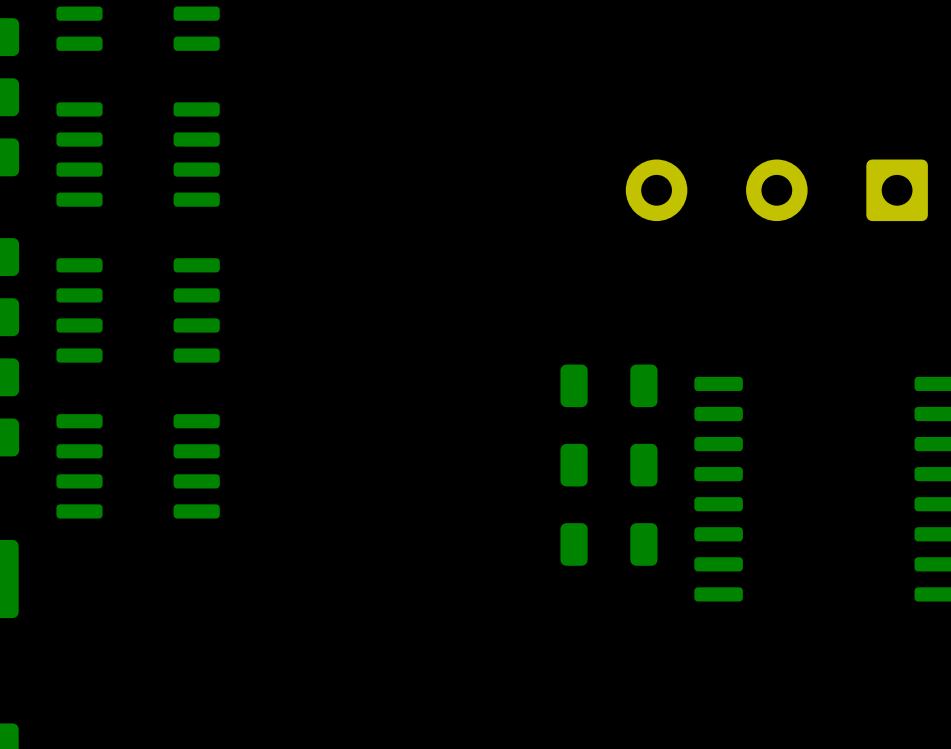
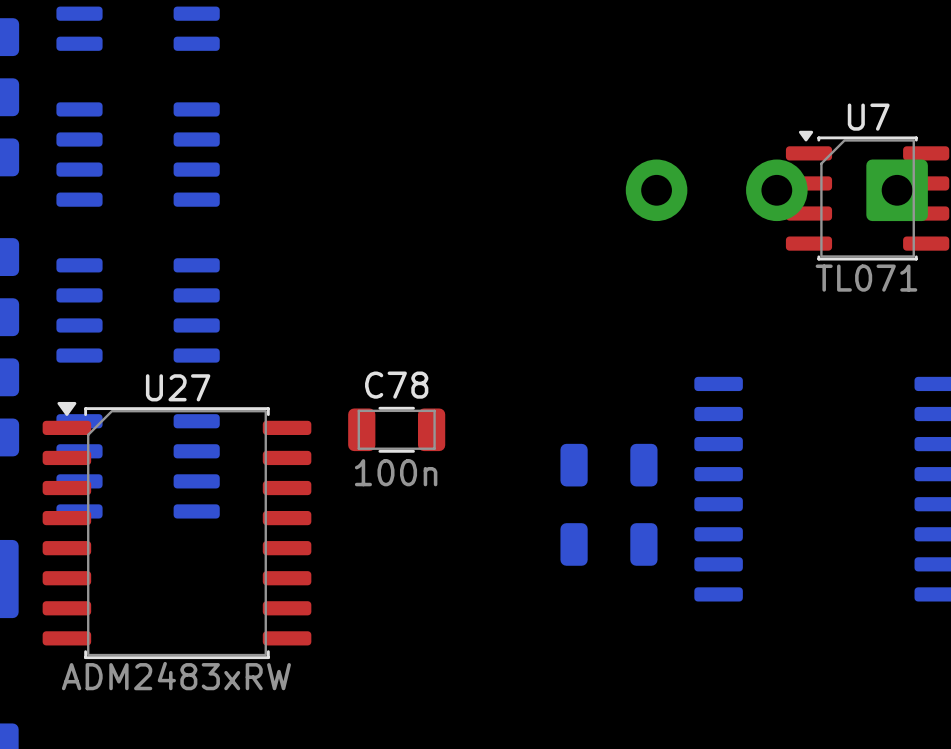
U7: none -> TL071 (867, 195)
C78 side: bottom (608, 385) -> top (396, 429)
U27: none -> ADM2483xRW (176, 530)

